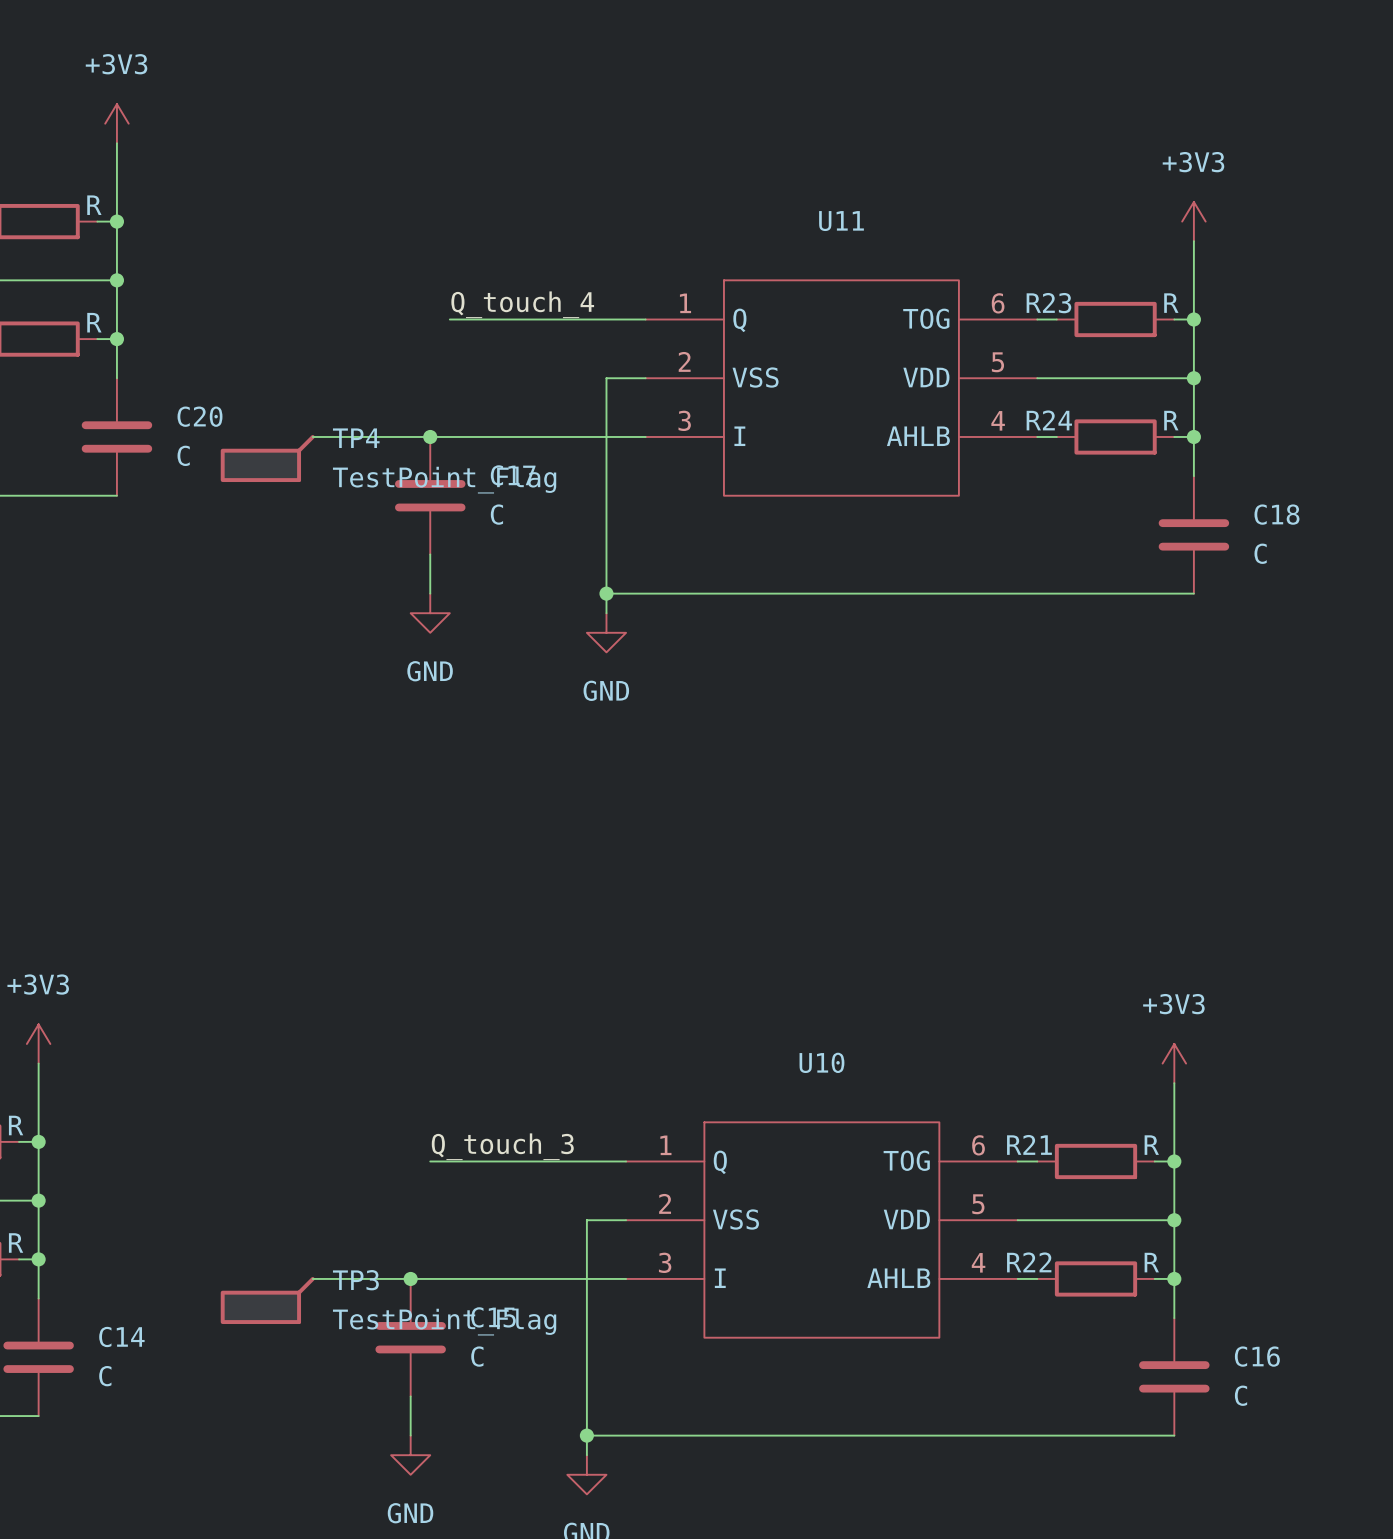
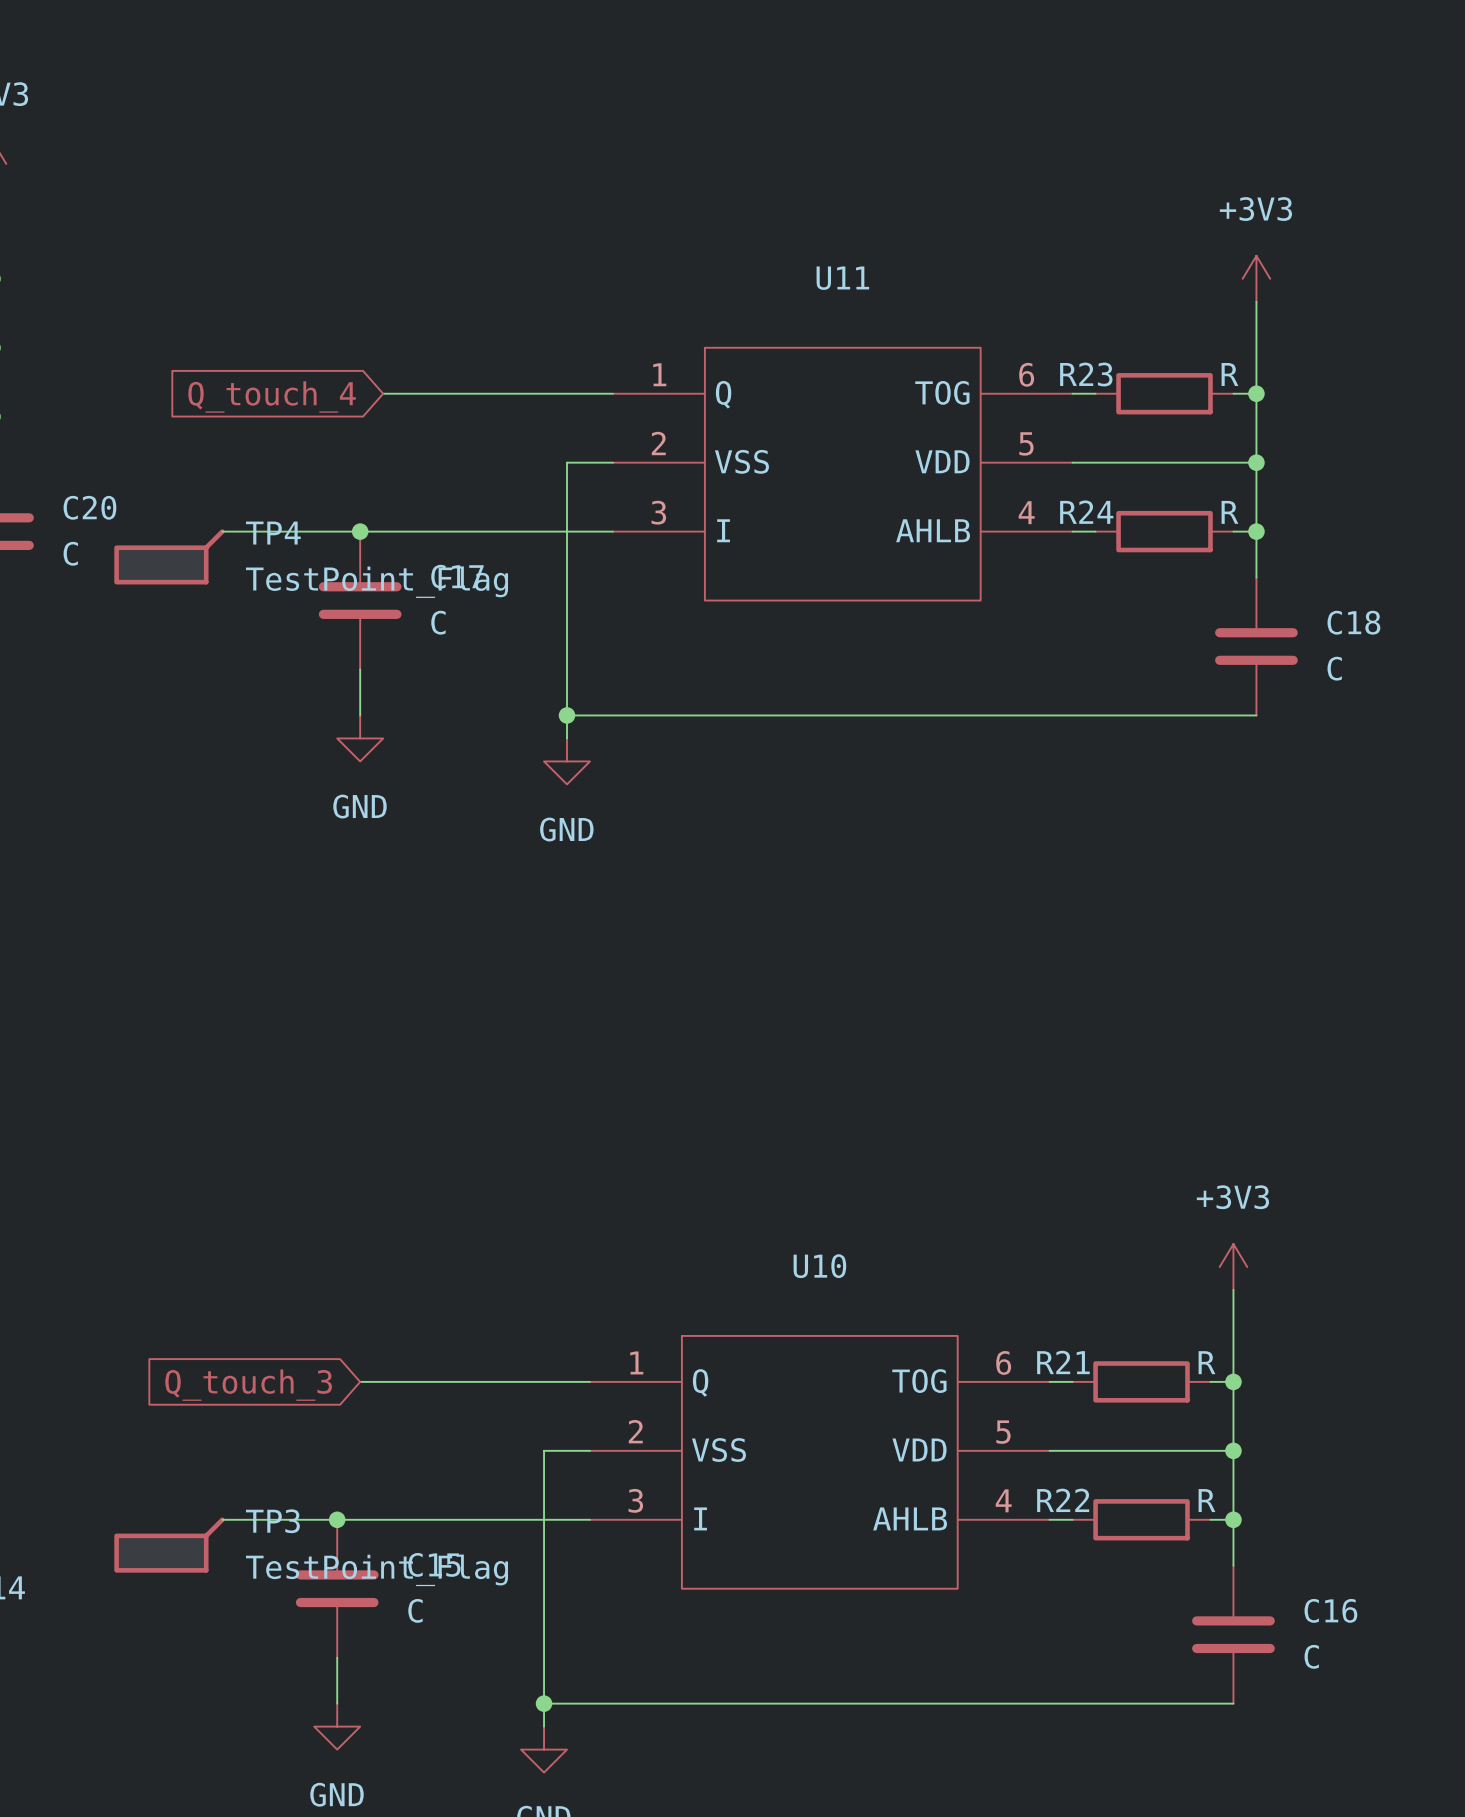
label: Q_touch_4 (522, 304) -> none
global label: none -> Q_touch_4 (272, 396)
label: Q_touch_3 (502, 1146) -> none
global label: none -> Q_touch_3 (248, 1385)

